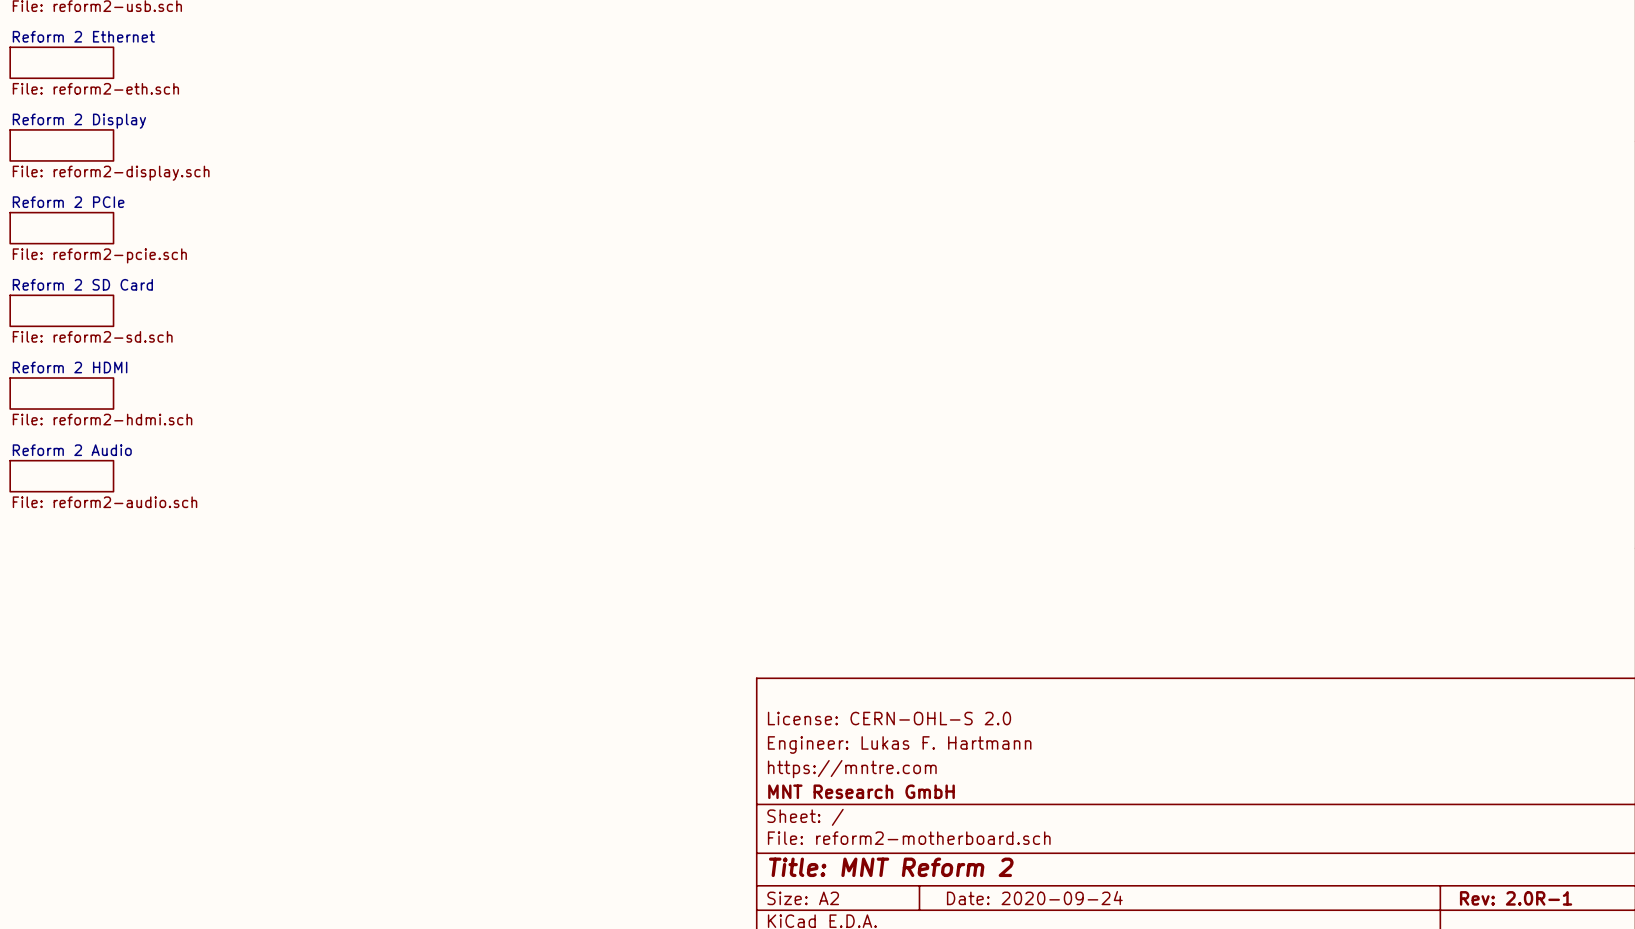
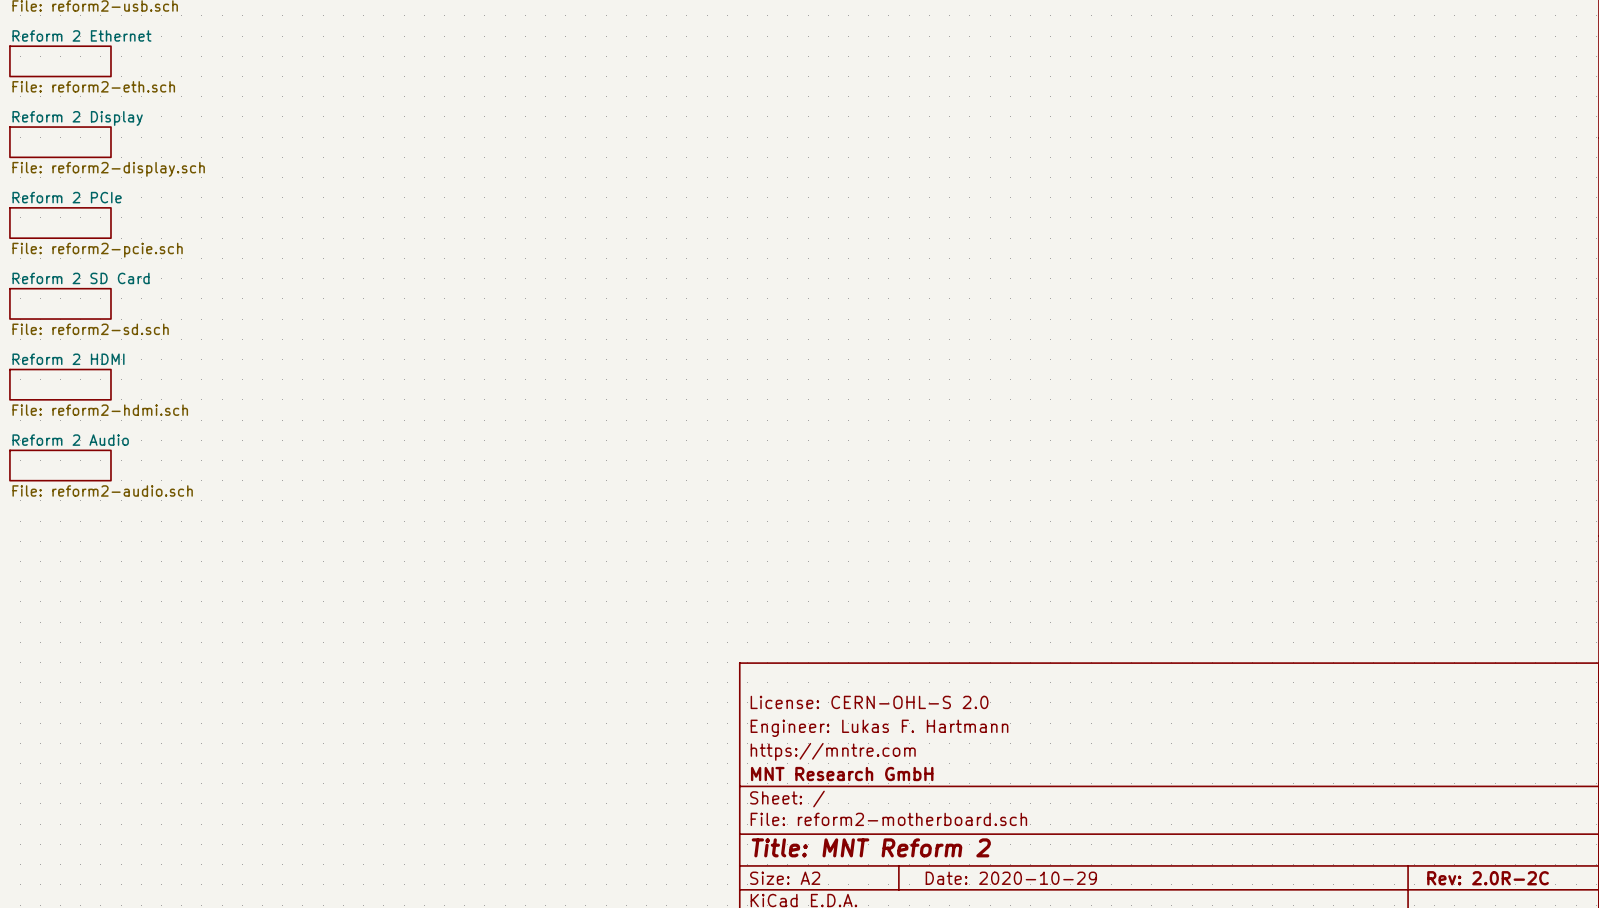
title block: Date: 2020-09-24 (1034, 898) -> Date: 2020-10-29 (1011, 878)
title block: Rev: 2.0R-1 (1516, 898) -> Rev: 2.0R-2C (1488, 878)

